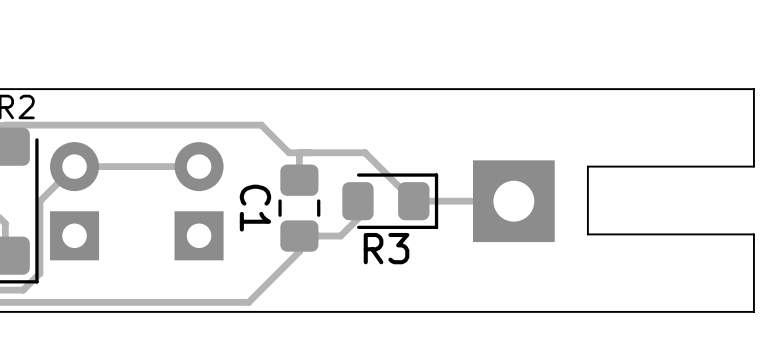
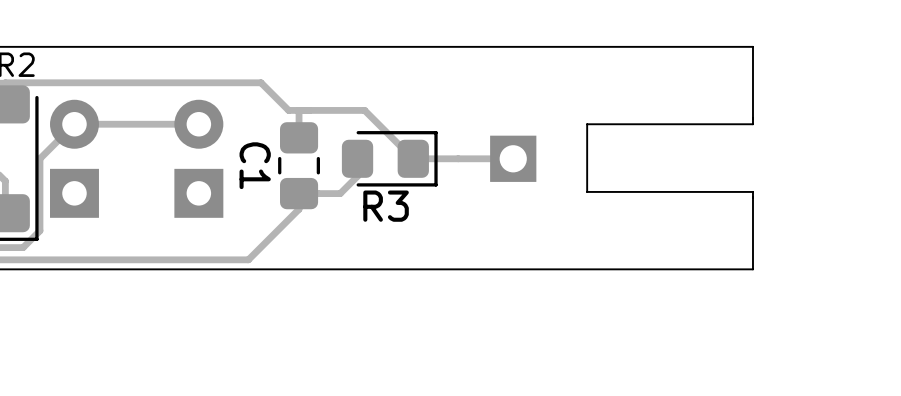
part footprint: [473, 160, 555, 243] -> [490, 135, 537, 182]

